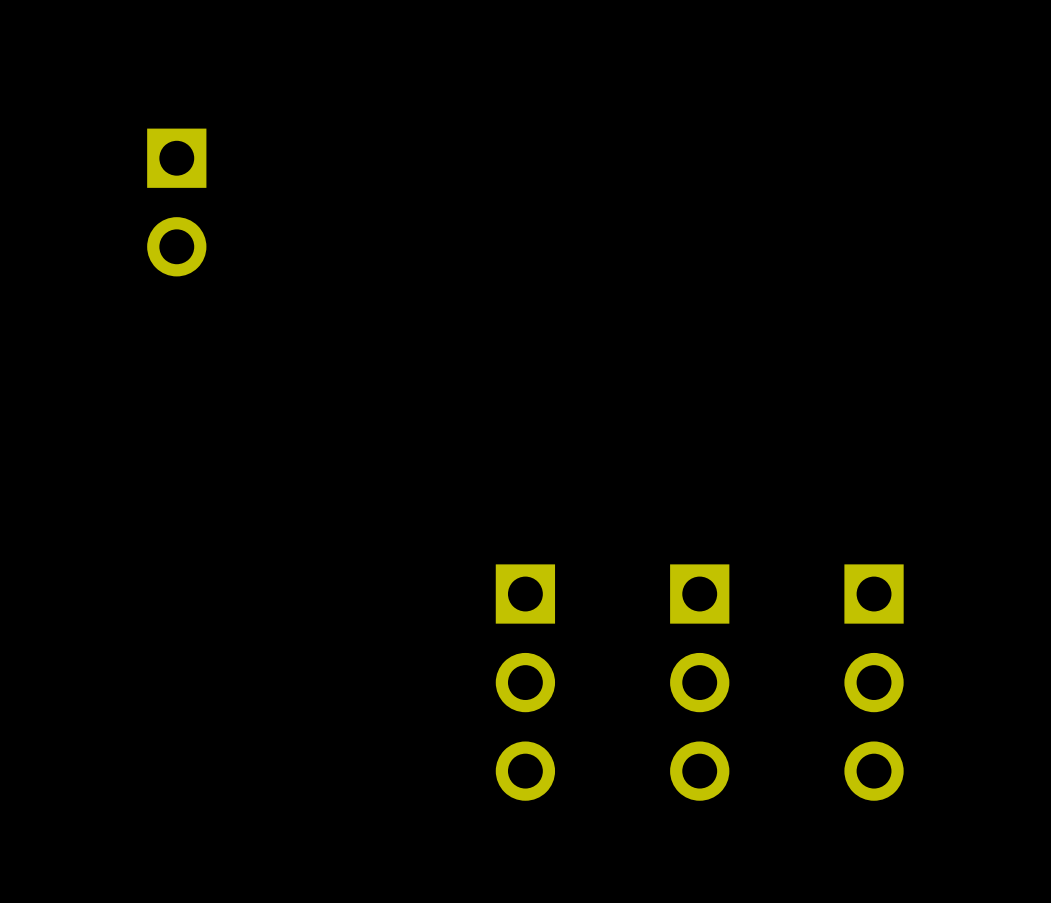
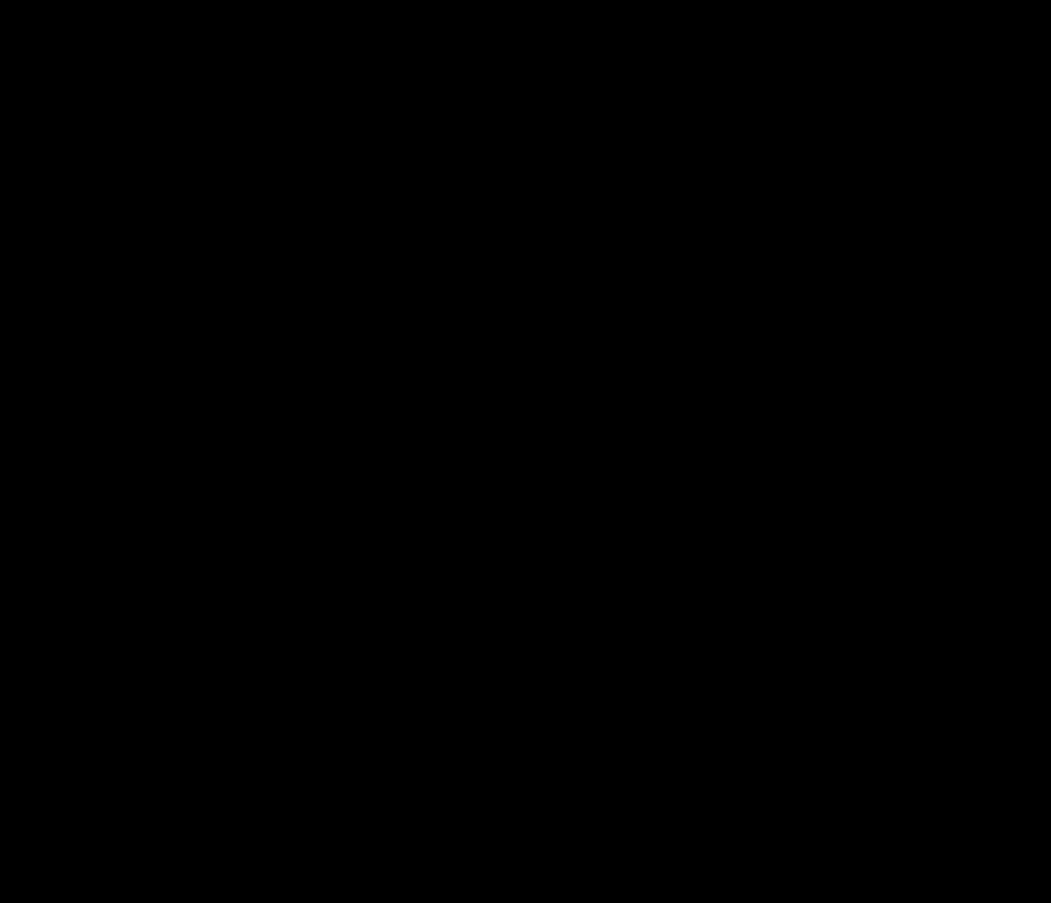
part: (176, 202) -> none
part: (525, 682) -> none
part: (699, 682) -> none
part: (874, 682) -> none

